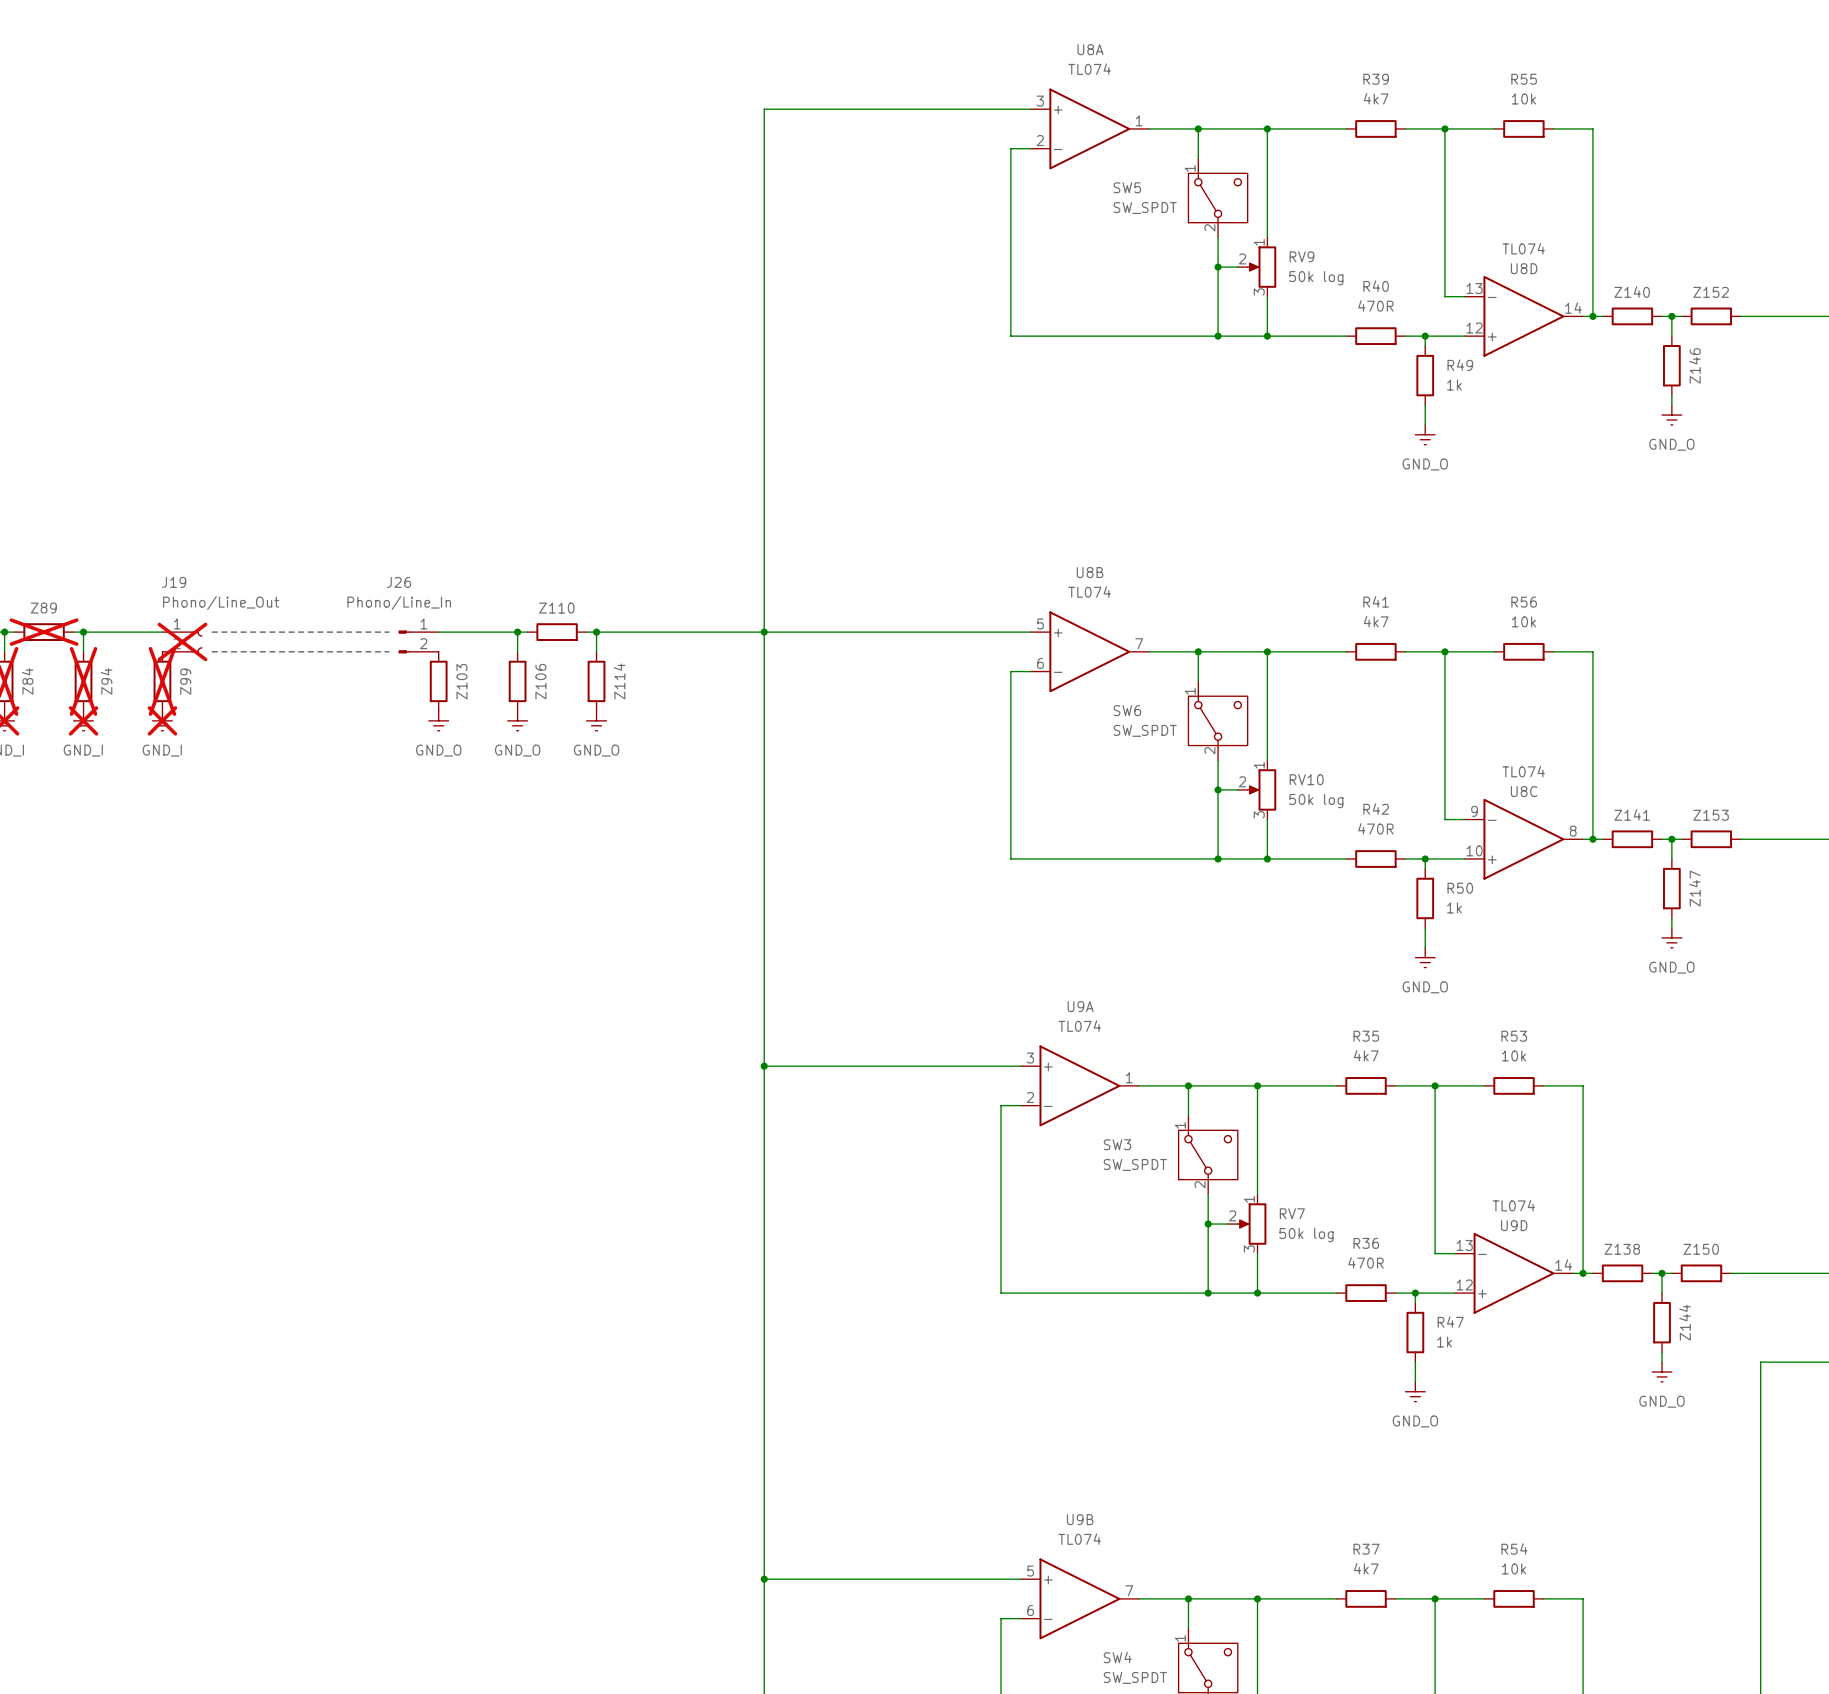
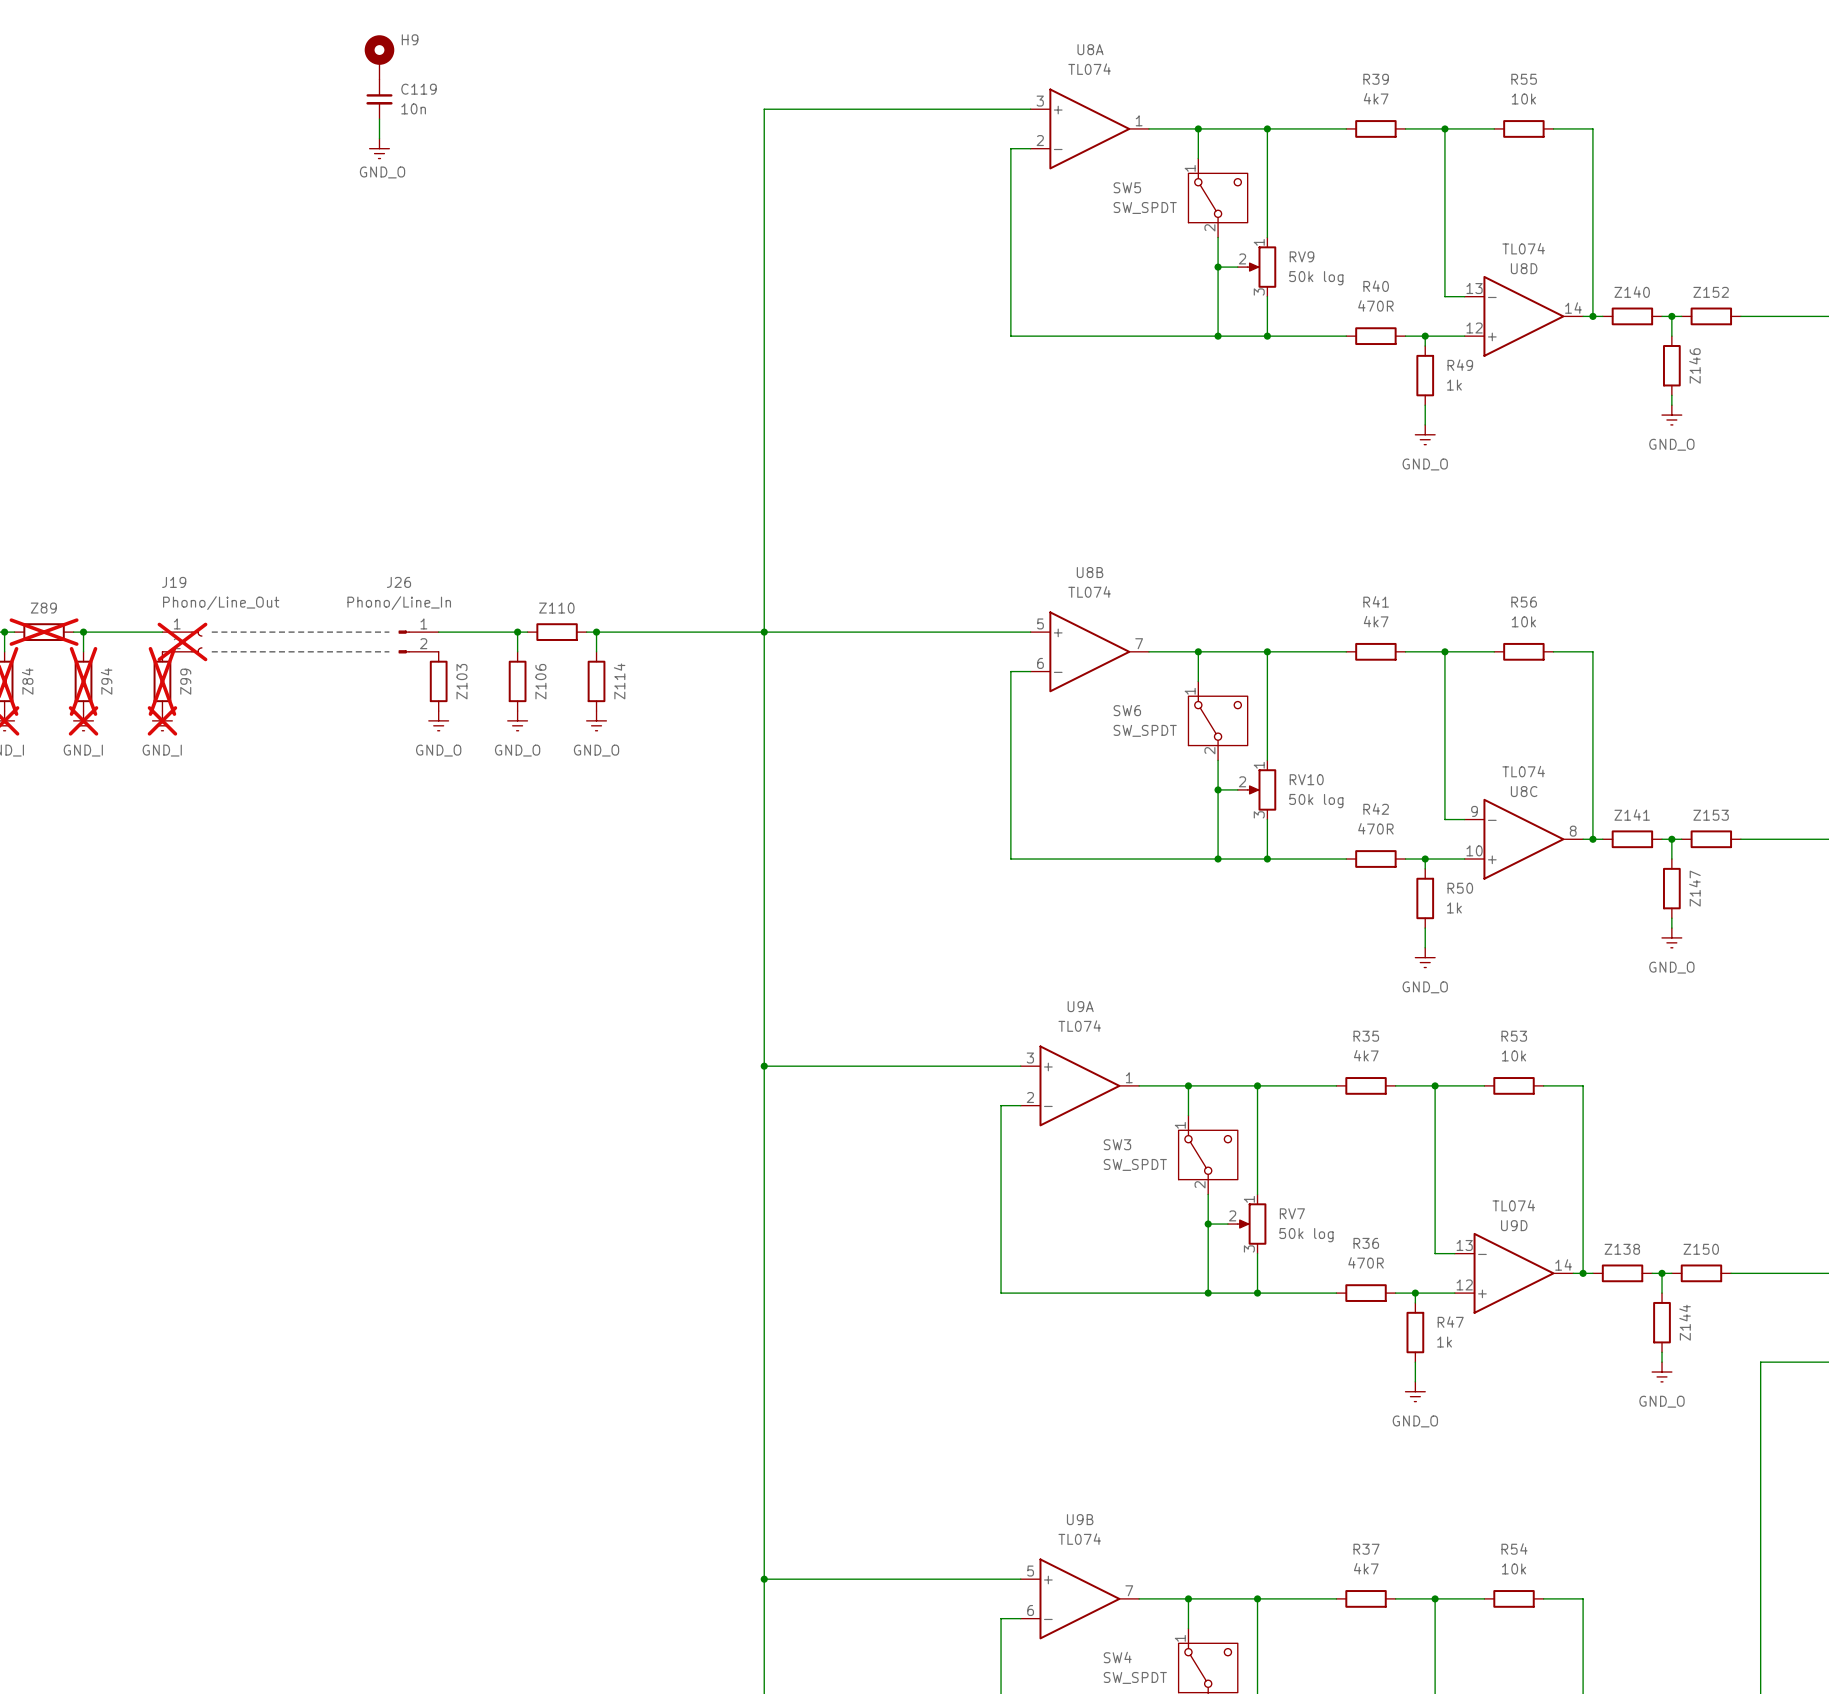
H9: none -> (379, 57)
C119: none -> 10n (379, 99)
wire: none -> (379, 119) (379, 138)
power symbol: none -> GND_O (379, 148)

